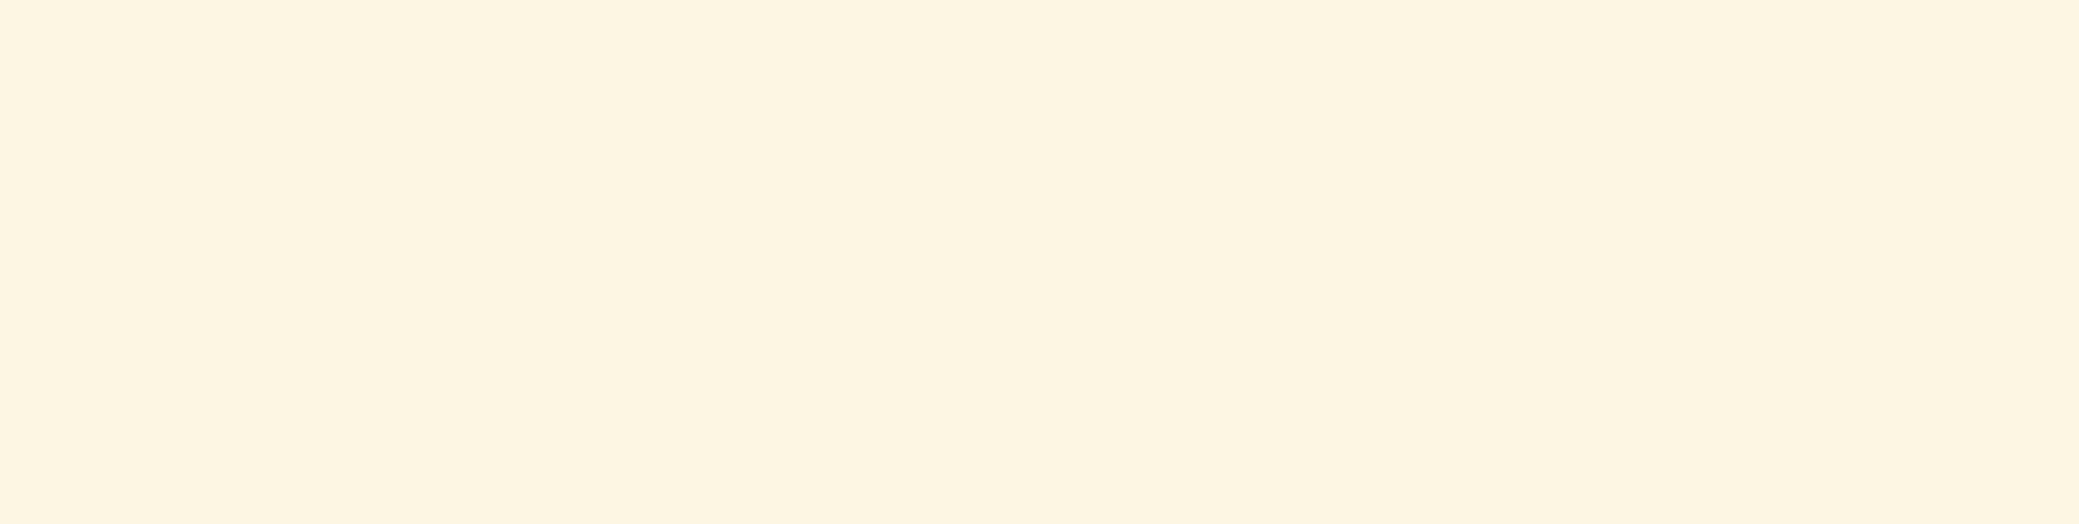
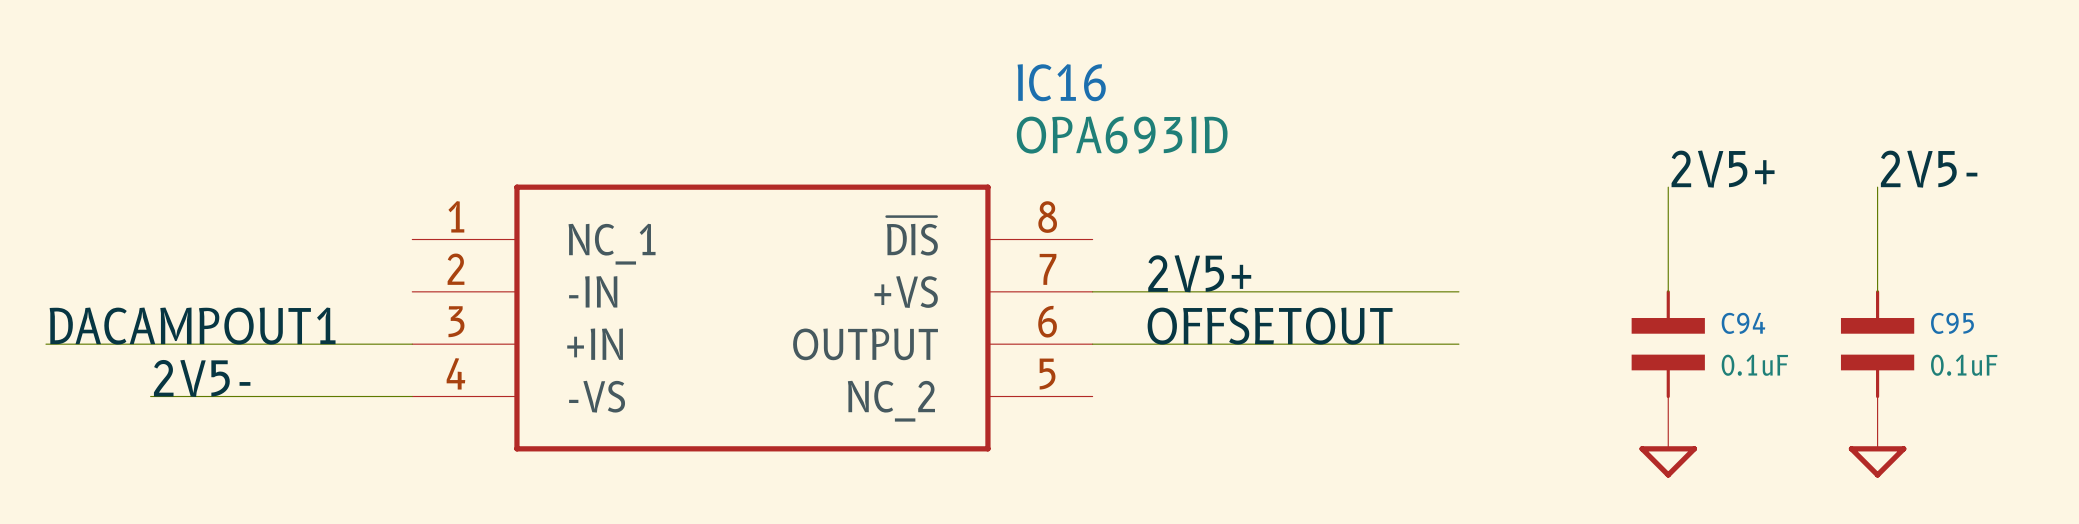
label: none -> 2V5+ (1723, 169)
label: none -> 2V5- (1929, 169)
wire: none -> (1668, 187) (1668, 291)
wire: none -> (1877, 187) (1877, 291)
label: none -> 2V5+ (1199, 273)
wire: none -> (1092, 291) (1458, 291)
IC16: none -> OPA693ID (752, 318)
label: none -> DACAMPOUT1 (192, 326)
label: none -> OFFSETOUT (1270, 326)
wire: none -> (45, 344) (412, 344)
wire: none -> (1092, 344) (1458, 344)
C94: none -> 0.1uF (1668, 344)
C95: none -> 0.1uF (1877, 344)
label: none -> 2V5- (202, 378)
wire: none -> (150, 396) (412, 396)
power symbol: none -> (1668, 437)
power symbol: none -> (1877, 437)

